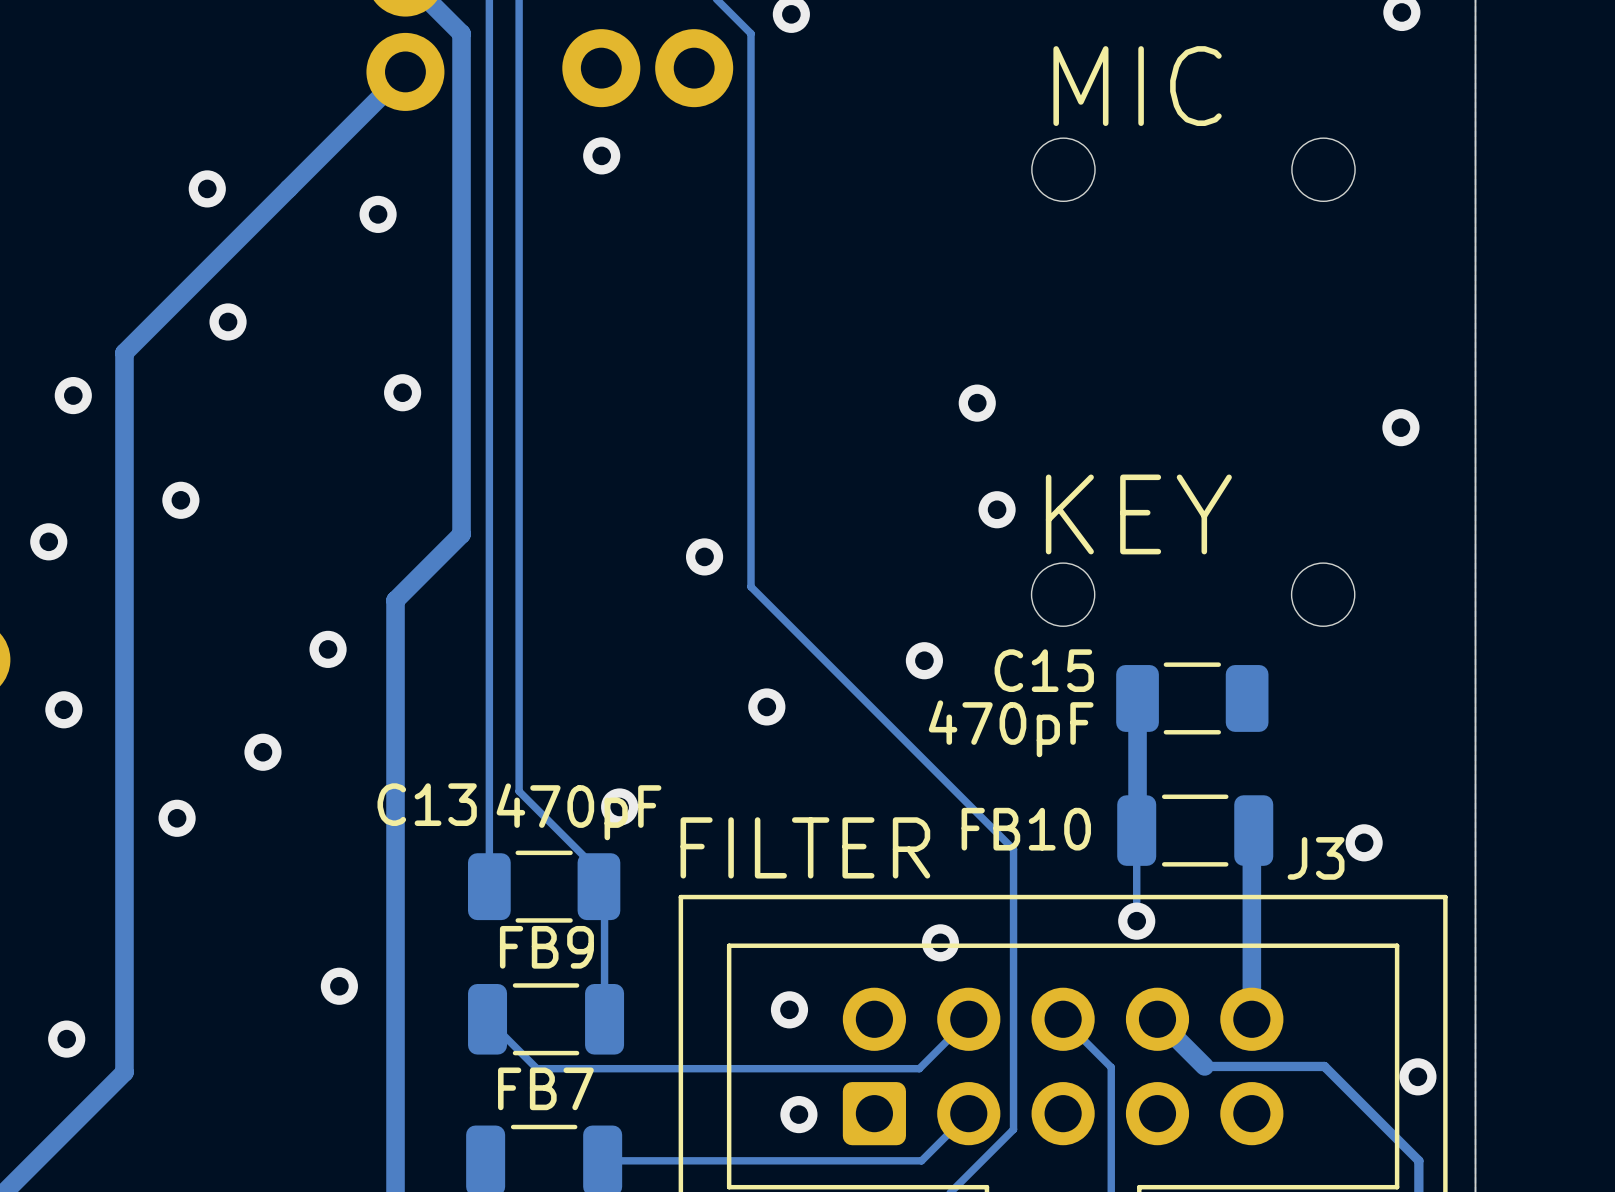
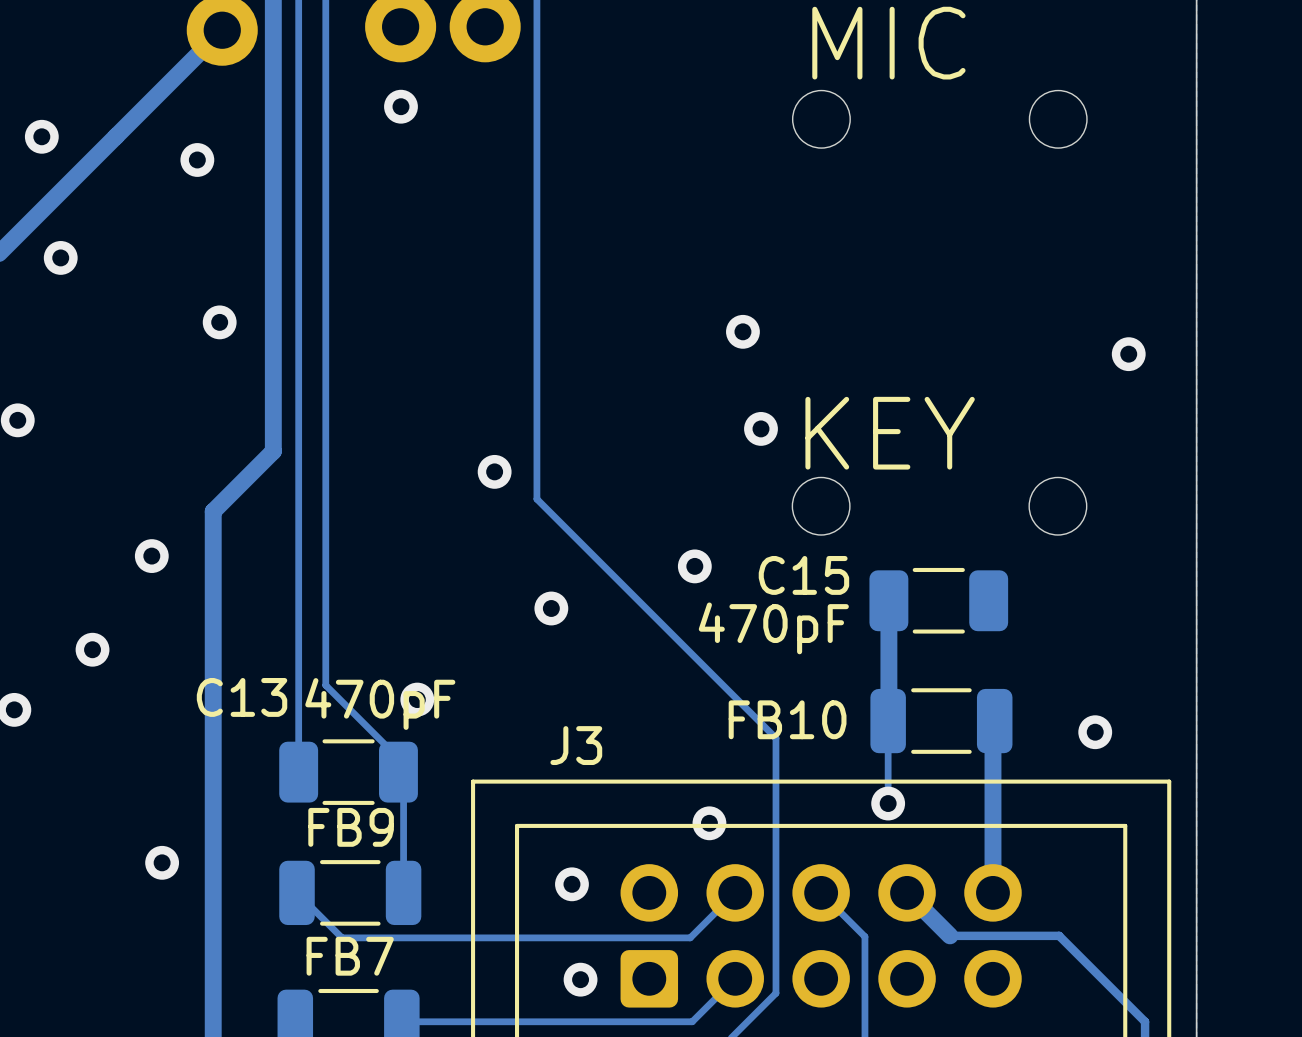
text: FILTER (805, 847) -> none
J3 name position: J3 (1316, 858) -> J3 (576, 745)
via: (1417, 1076) -> none

